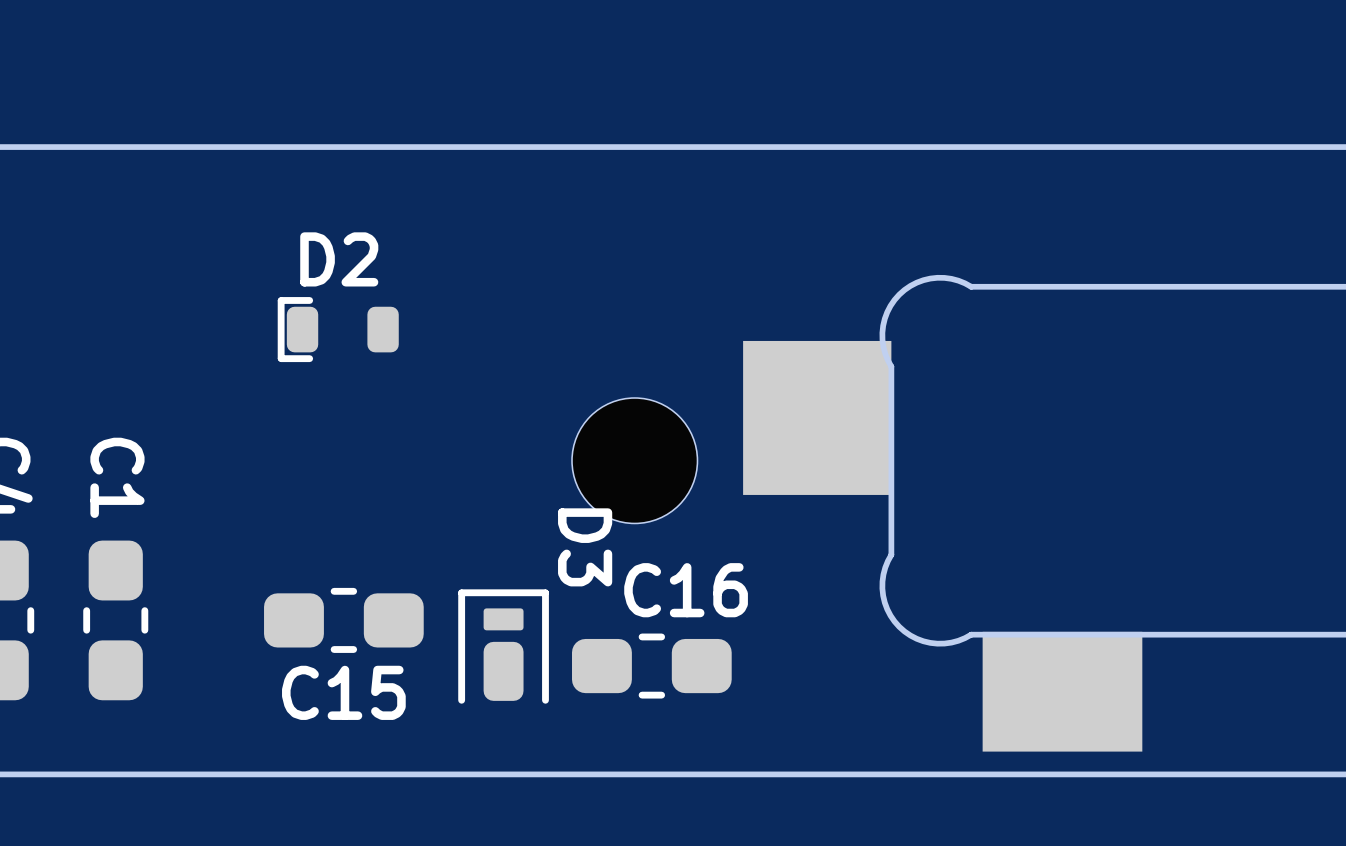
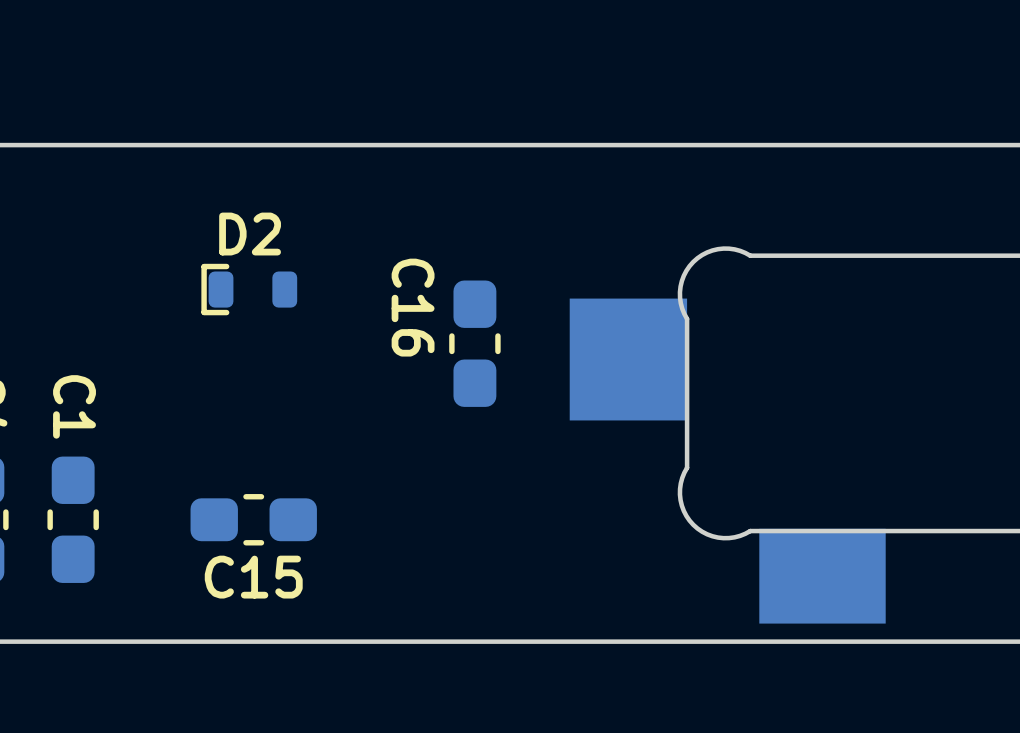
part: (634, 460) -> none
C16 name position: C16 (686, 590) -> C16 (413, 307)
D3: (503, 646) -> none
C16 rotation: 0° (651, 666) -> 90° clockwise (474, 343)
C16 position: (651, 666) -> (474, 343)

